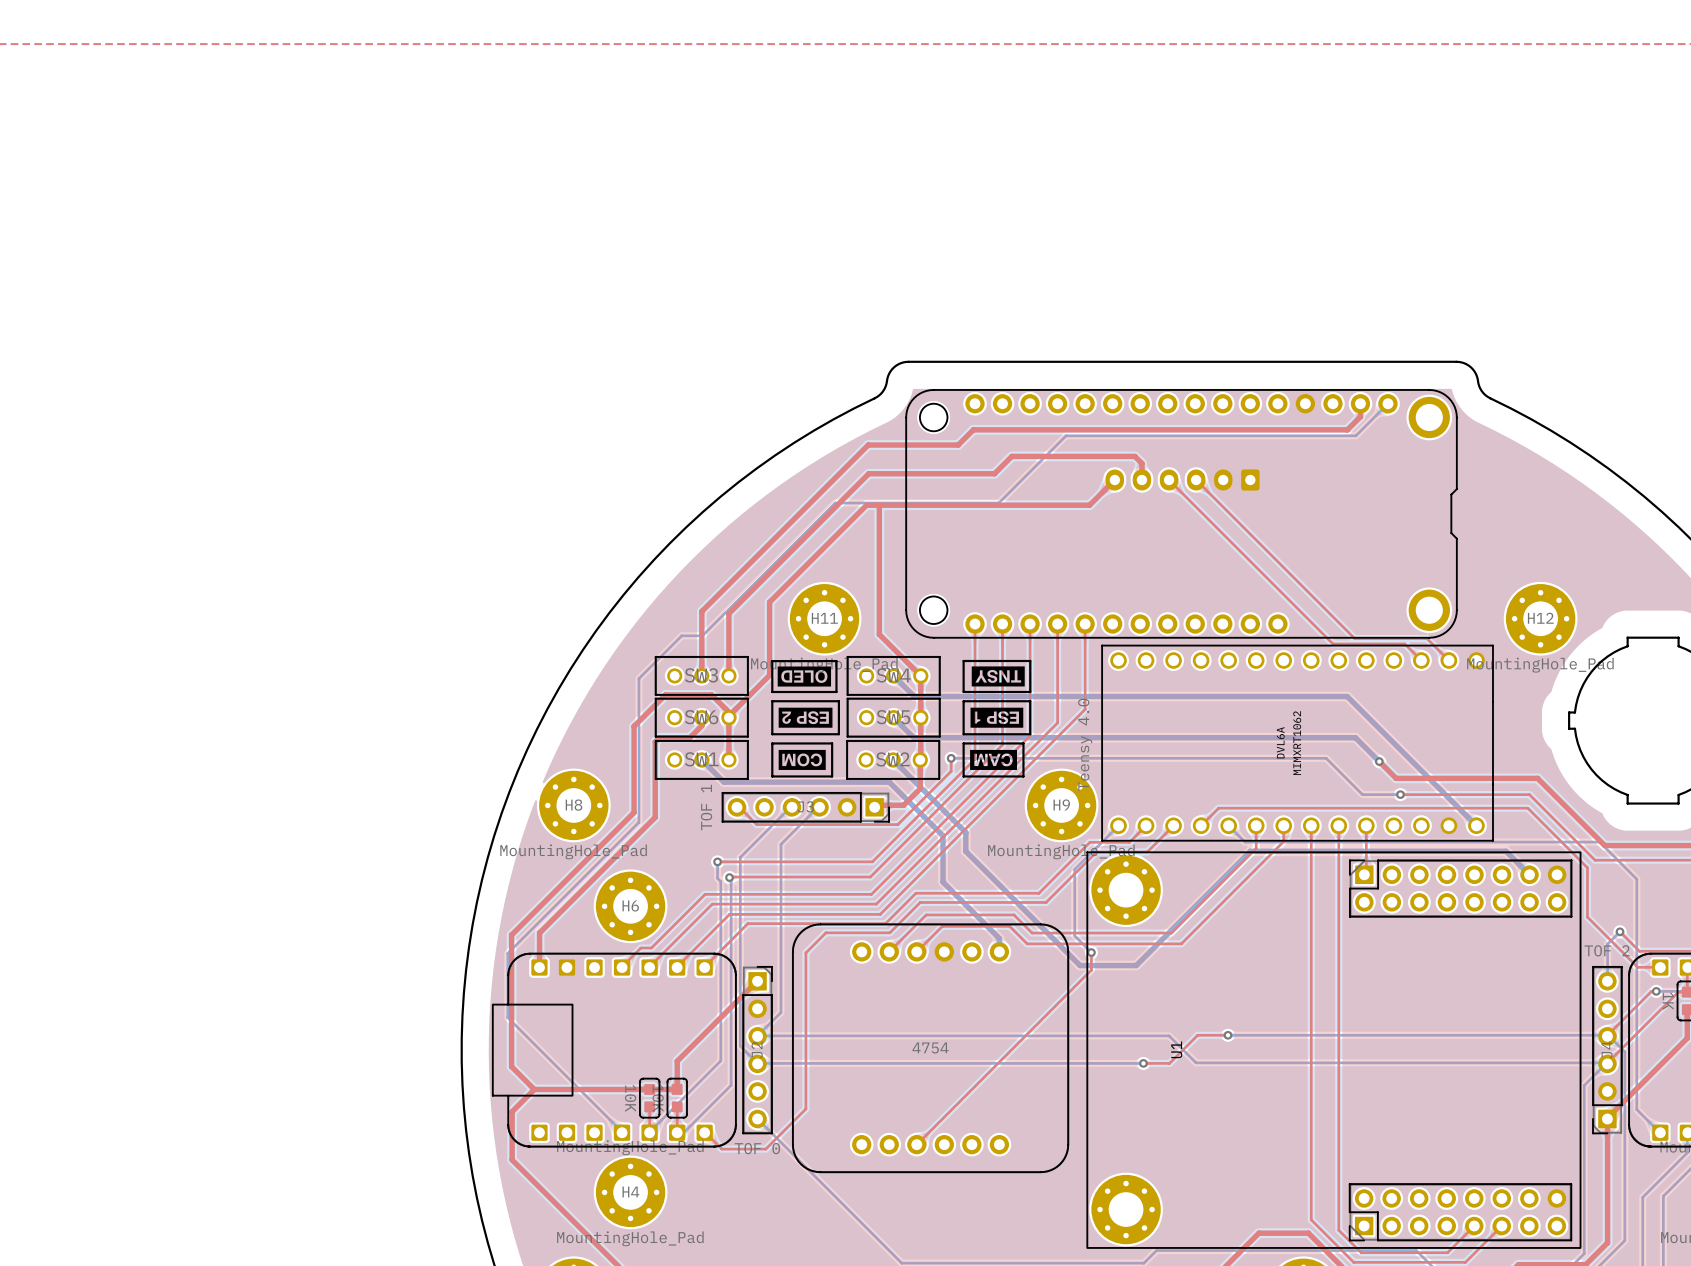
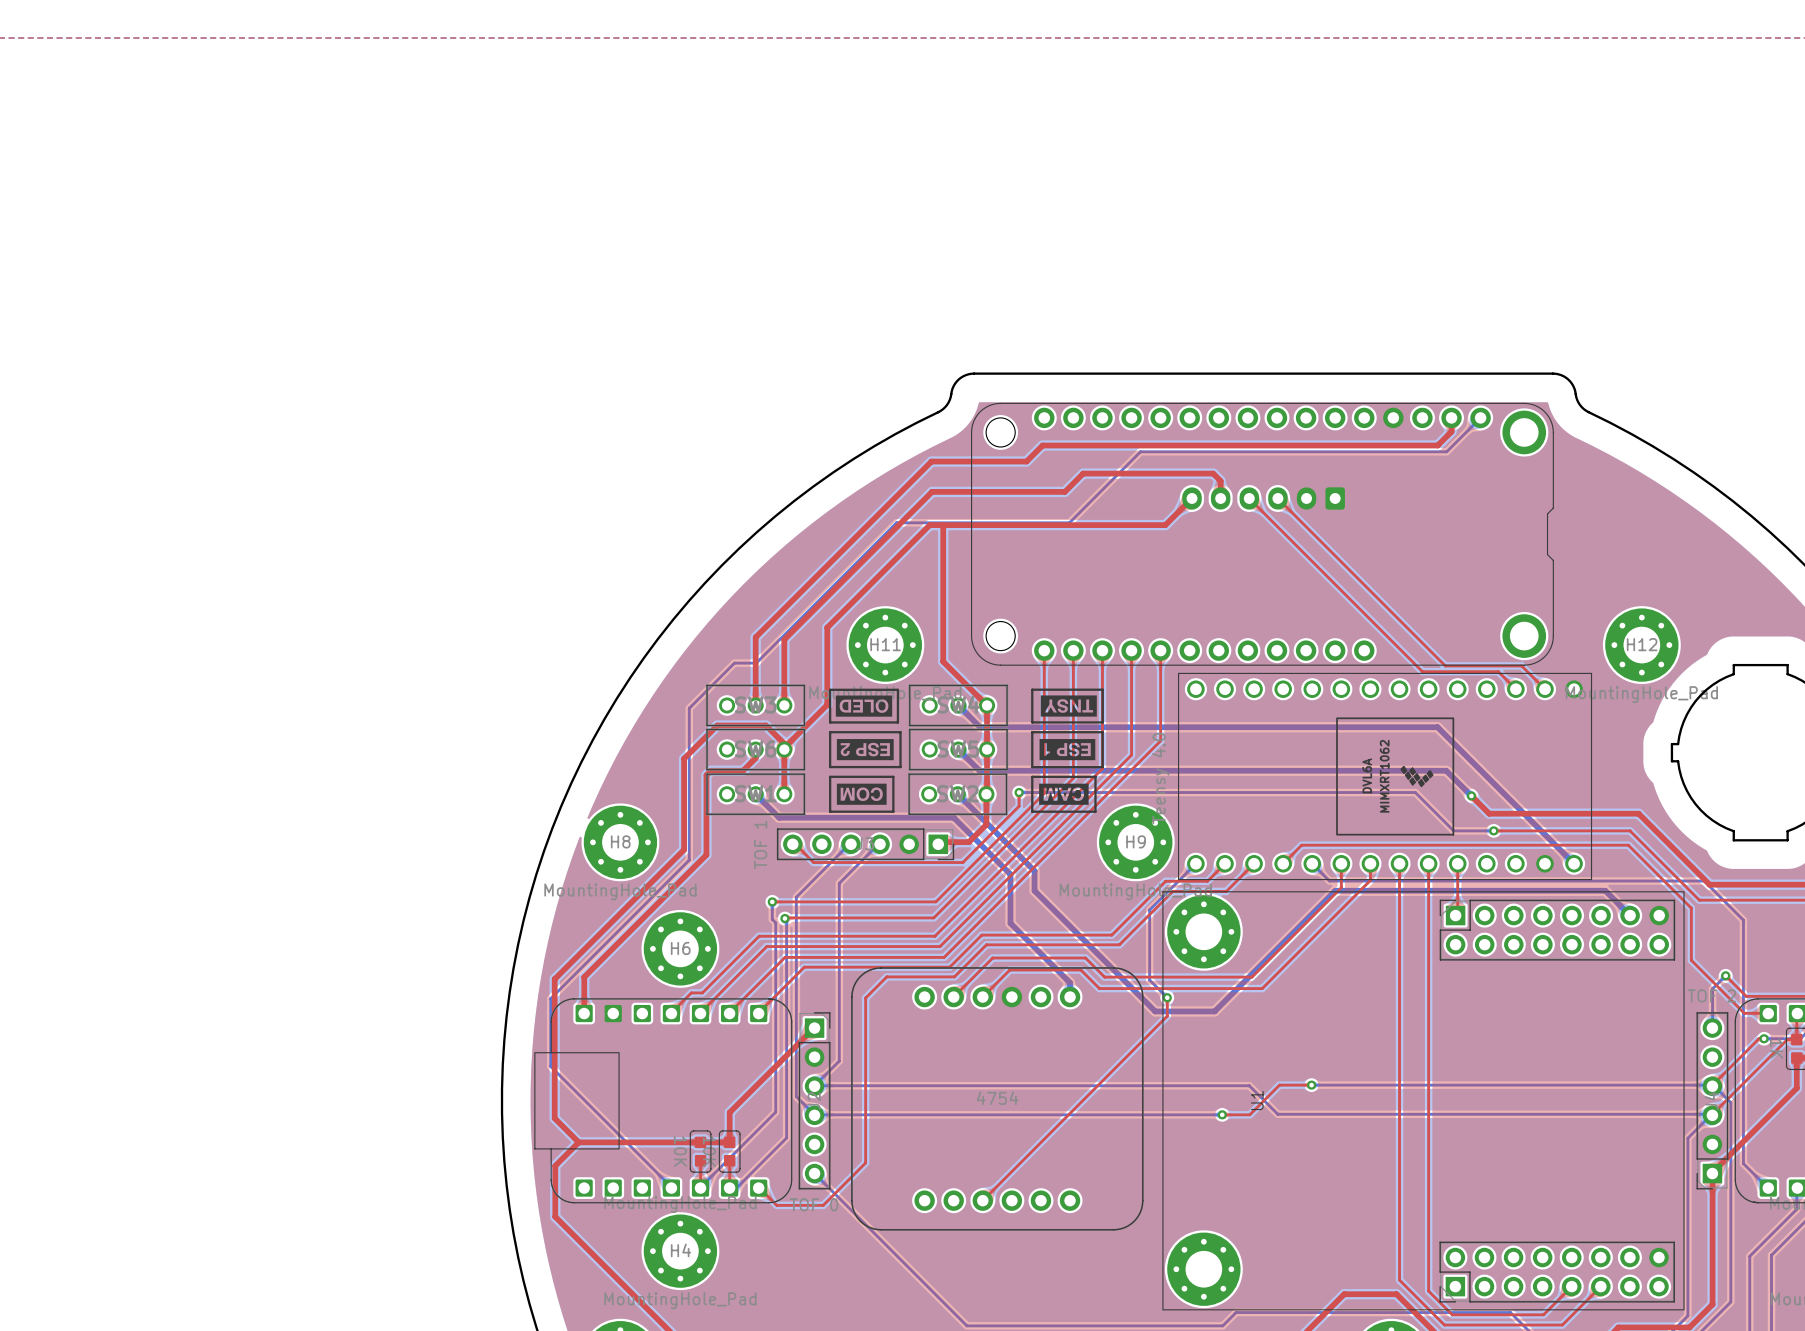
part footprint: [1101, 645, 1494, 842] -> [1177, 672, 1593, 881]

